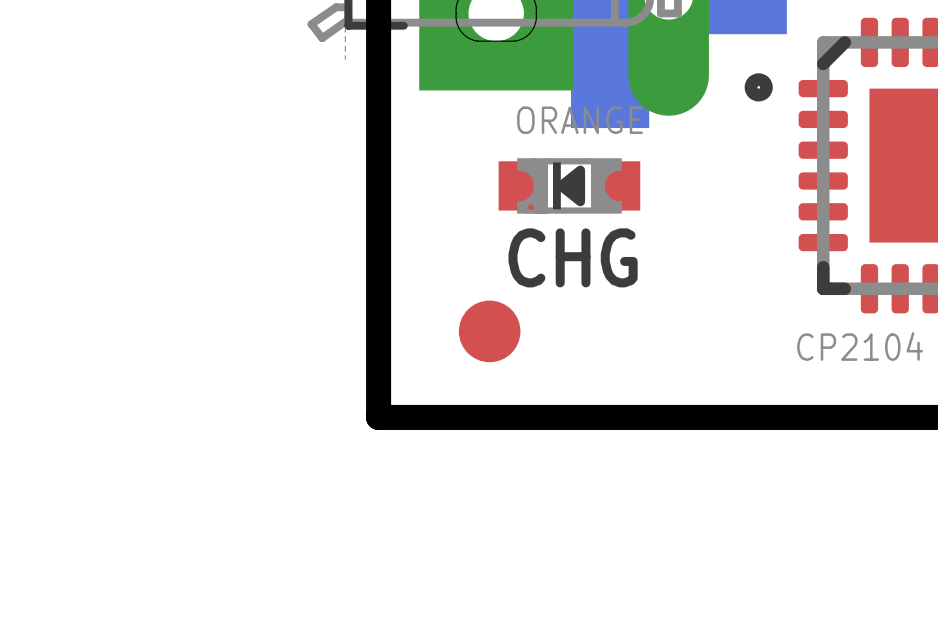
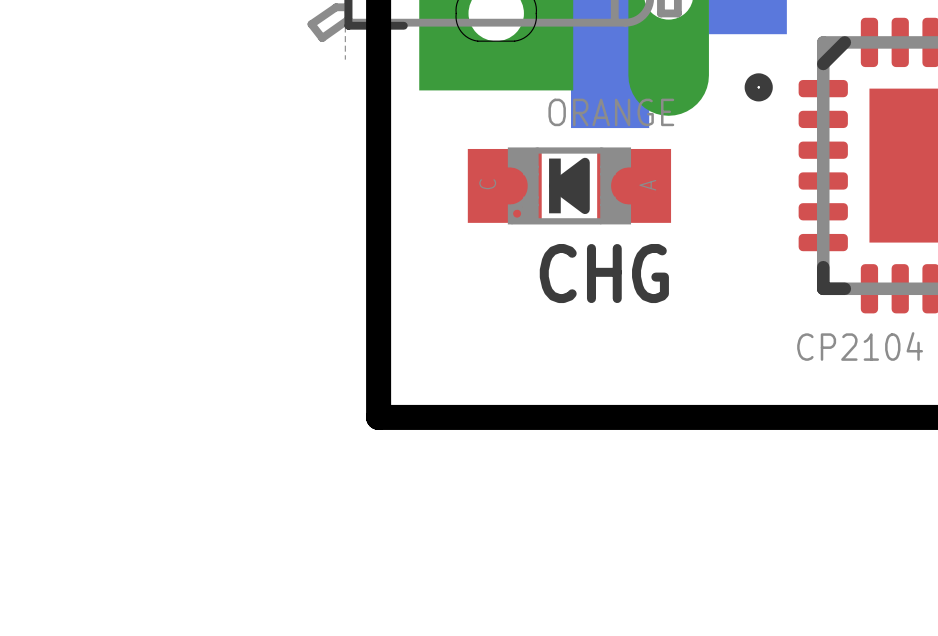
CHG footprint: [498, 158, 641, 214] -> [467, 147, 672, 225]
part: (489, 331) -> none

